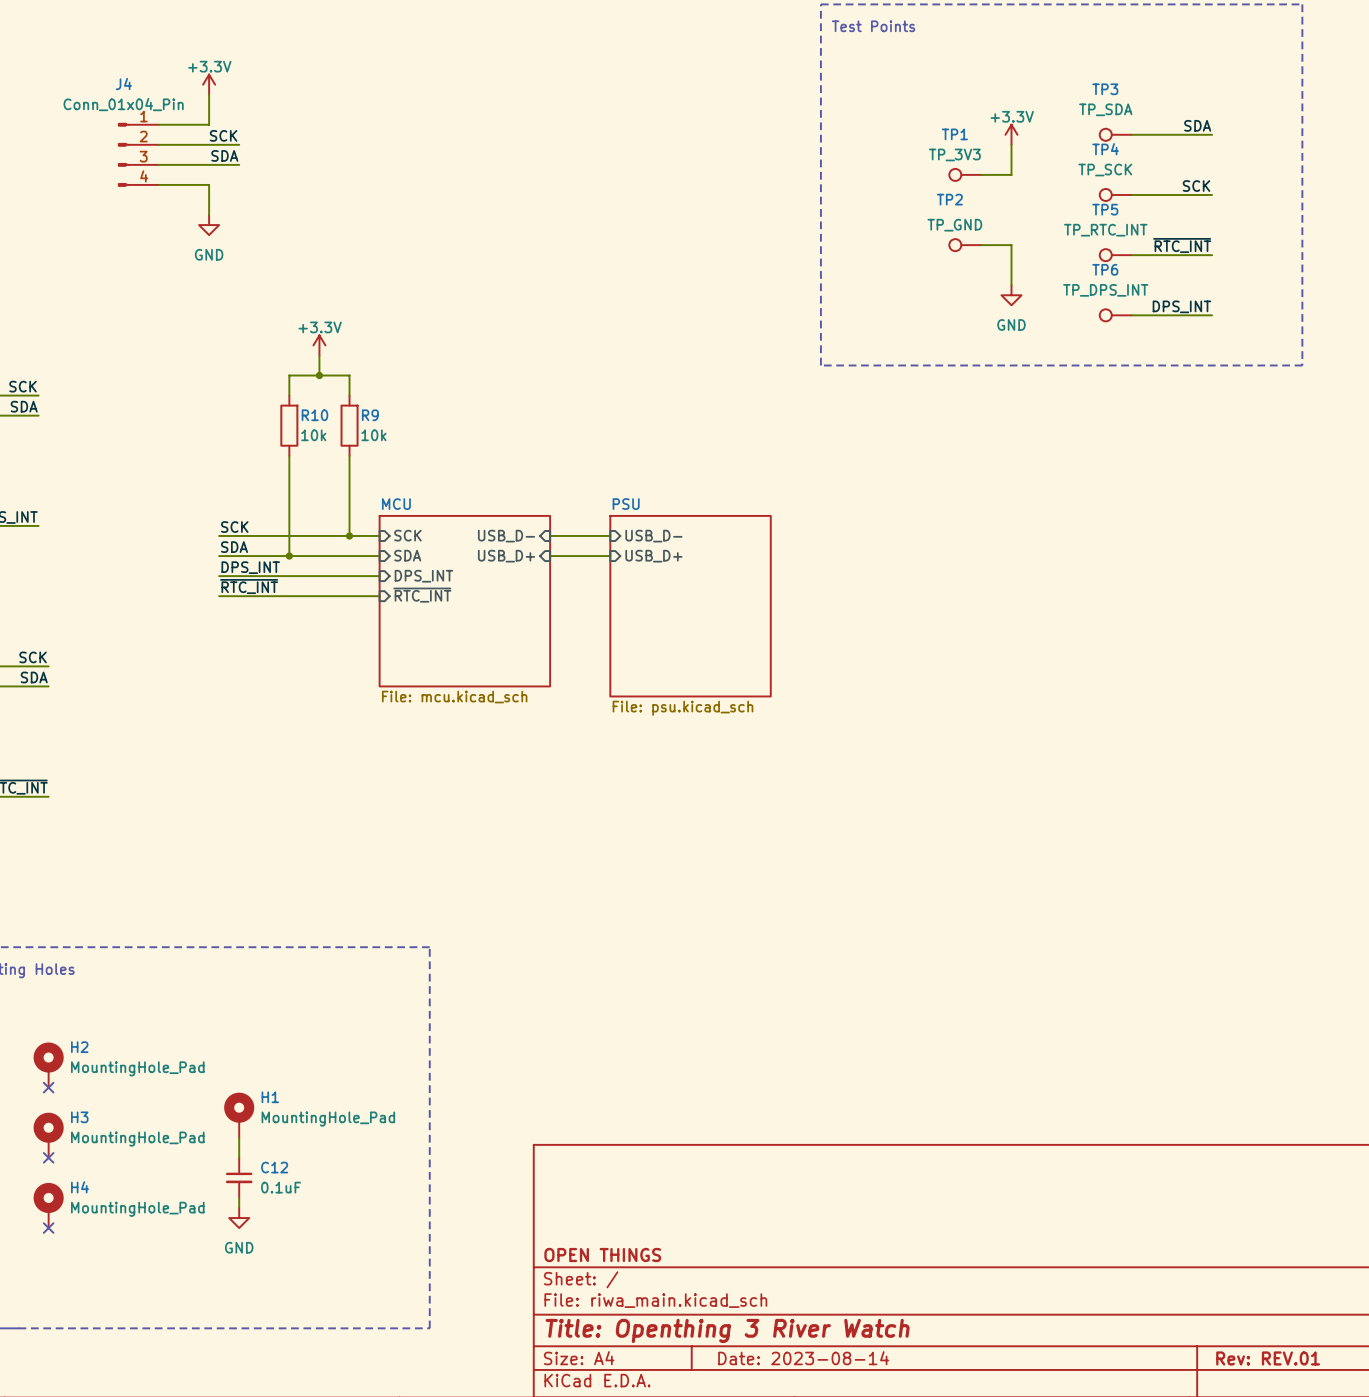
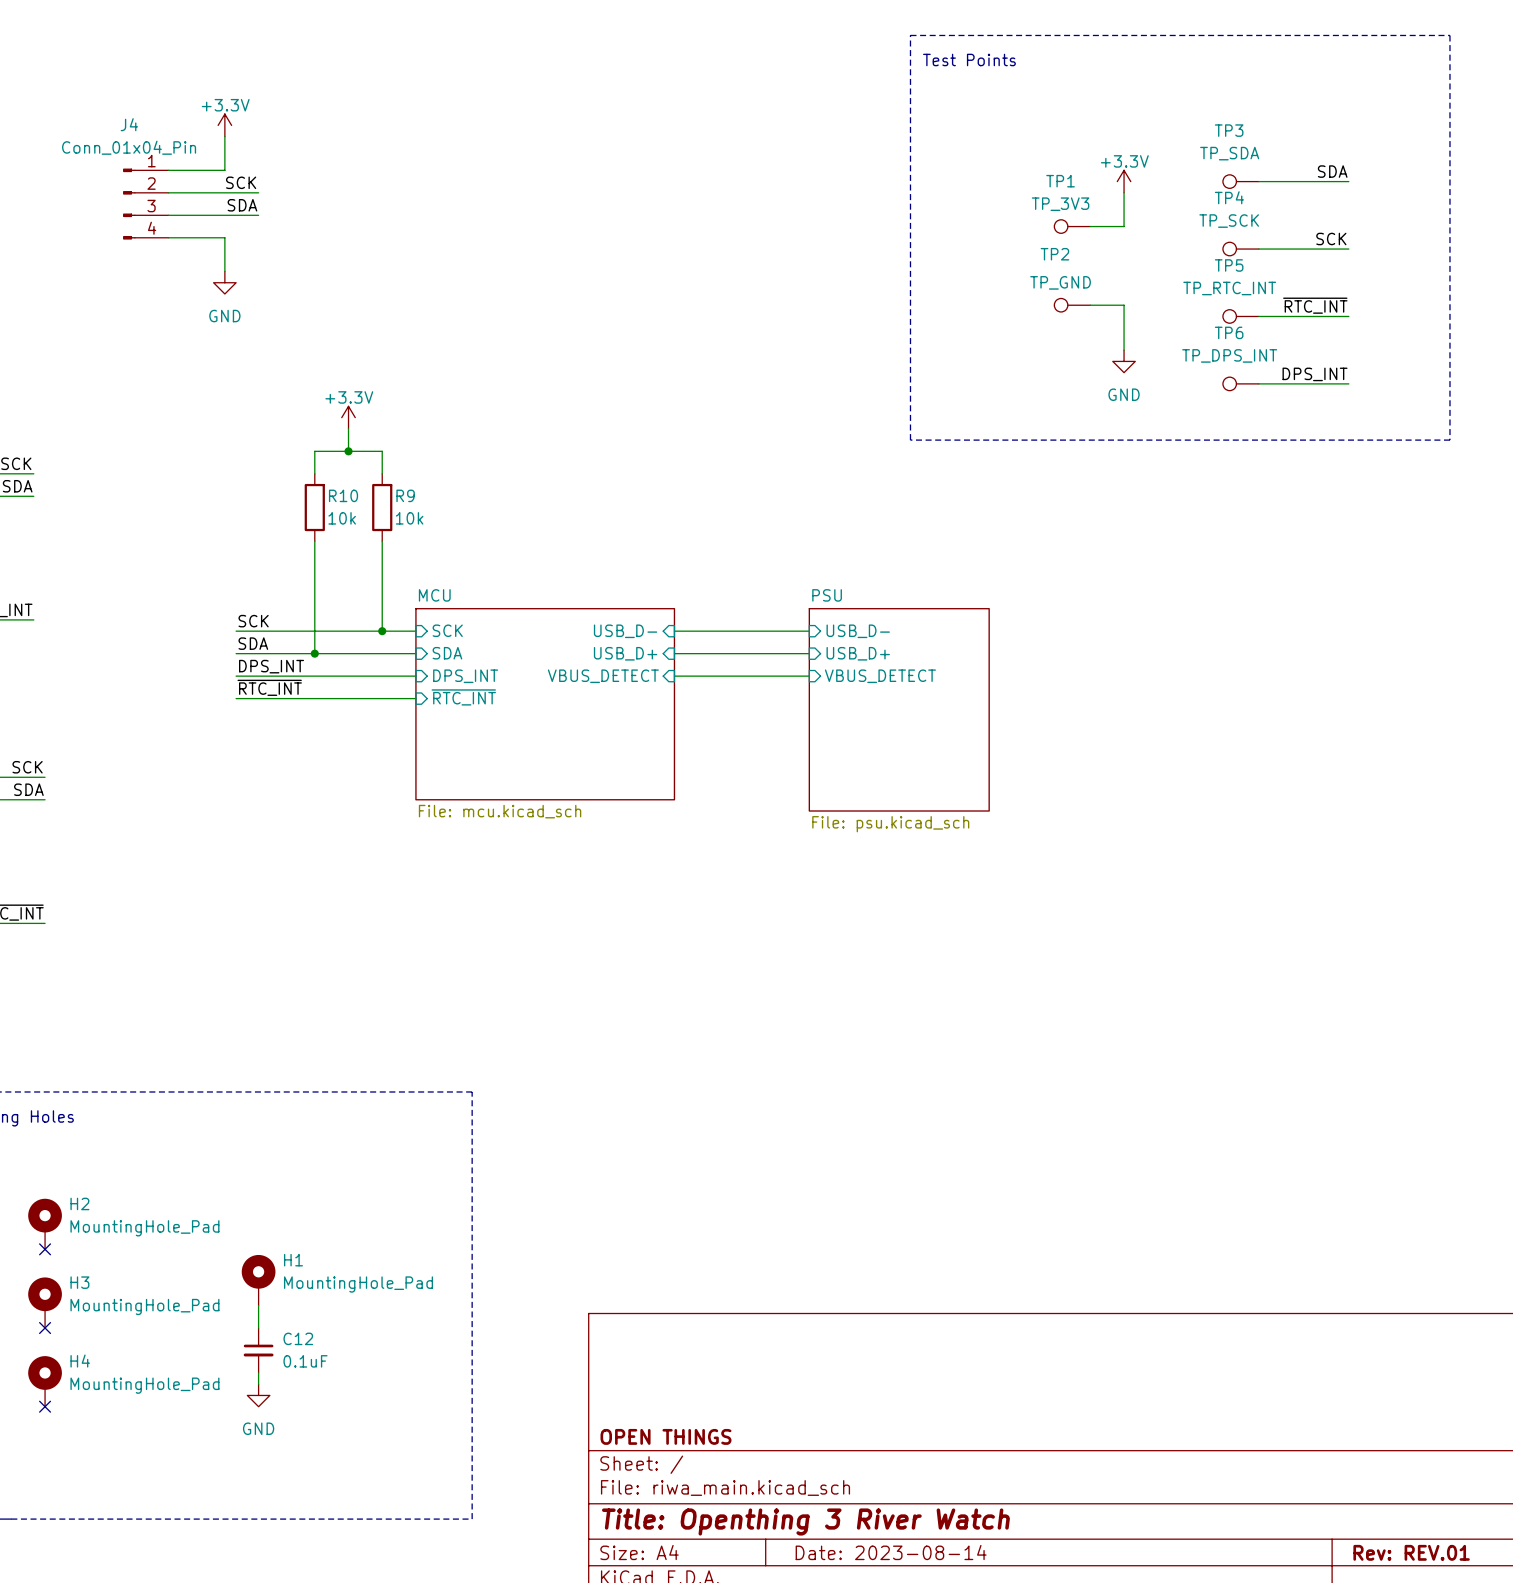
wire: (550, 535) (610, 535) -> (809, 631) (674, 631)
sheet pin: USB_D- (506, 536) -> none
sheet pin rotation: 0° (653, 536) -> 180° (625, 631)
sheet pin position: USB_D- (653, 536) -> USB_D- (625, 631)
sheet pin: none -> USB_D- (858, 631)
sheet pin: USB_D+ (506, 556) -> none
wire: (550, 556) (610, 556) -> (809, 653) (674, 653)
sheet pin rotation: 0° (653, 556) -> 180° (625, 653)
sheet pin position: USB_D+ (653, 556) -> USB_D+ (625, 653)
sheet pin: none -> USB_D+ (858, 653)
sheet pin: none -> VBUS_DETECT (603, 676)
wire: none -> (674, 676) (809, 676)
sheet pin: none -> VBUS_DETECT (880, 676)
sheet MCU: File: mcu.kicad_sch (464, 601) -> none
sheet MCU: none -> File: mcu.kicad_sch (545, 704)
sheet PSU position: (690, 606) -> (899, 709)

